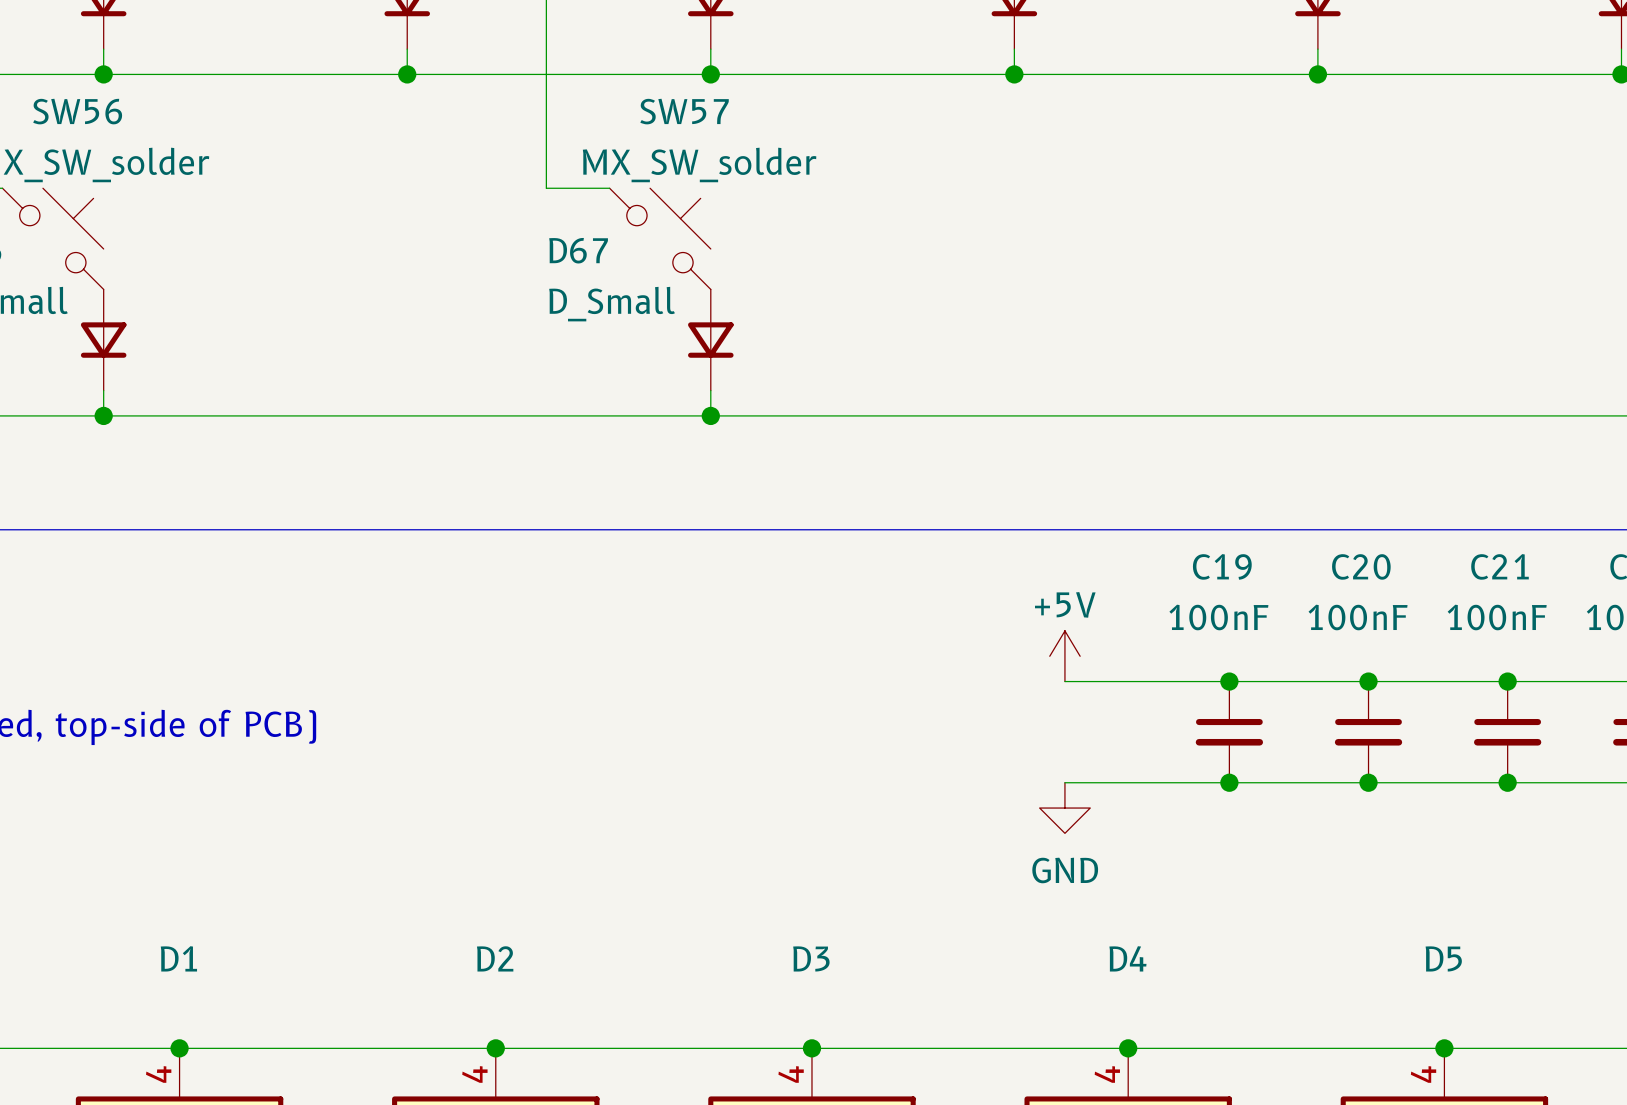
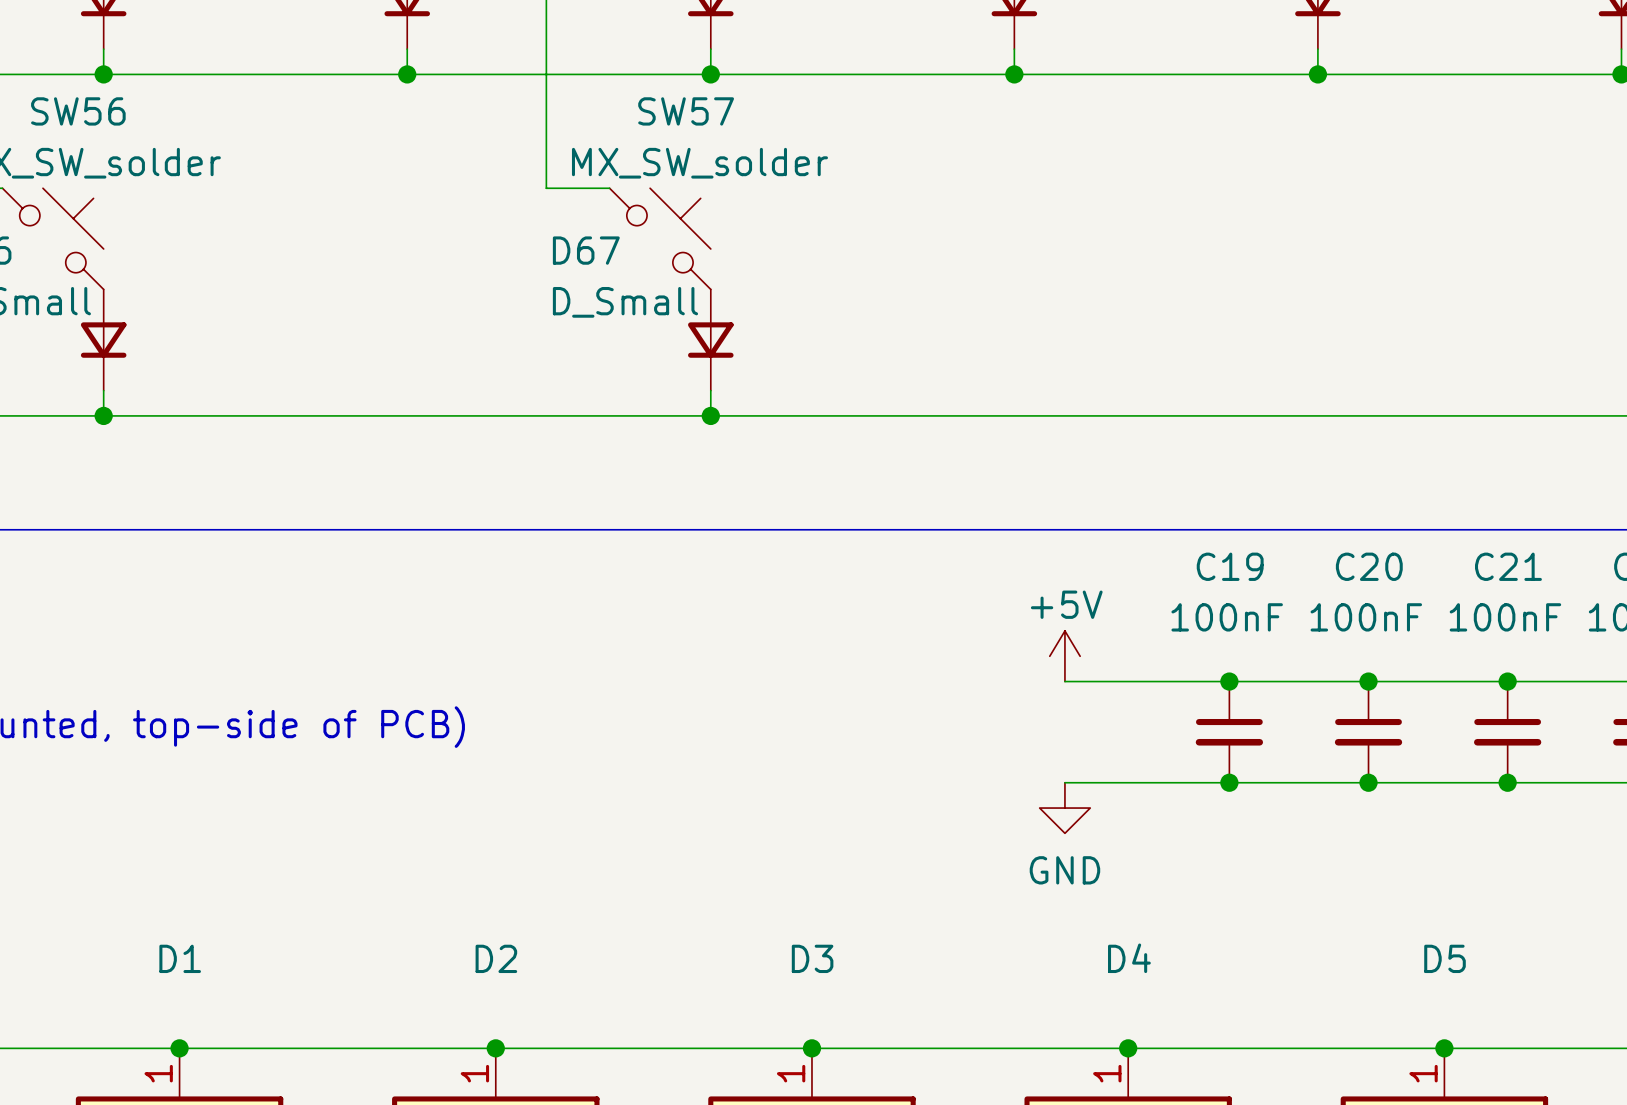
D1 pin number: 4 (158, 1074) -> 1 (158, 1073)
D2 pin number: 4 (474, 1074) -> 1 (474, 1073)
D3 pin number: 4 (791, 1074) -> 1 (791, 1073)
D4 pin number: 4 (1107, 1074) -> 1 (1107, 1073)
D5 pin number: 4 (1423, 1074) -> 1 (1423, 1073)

